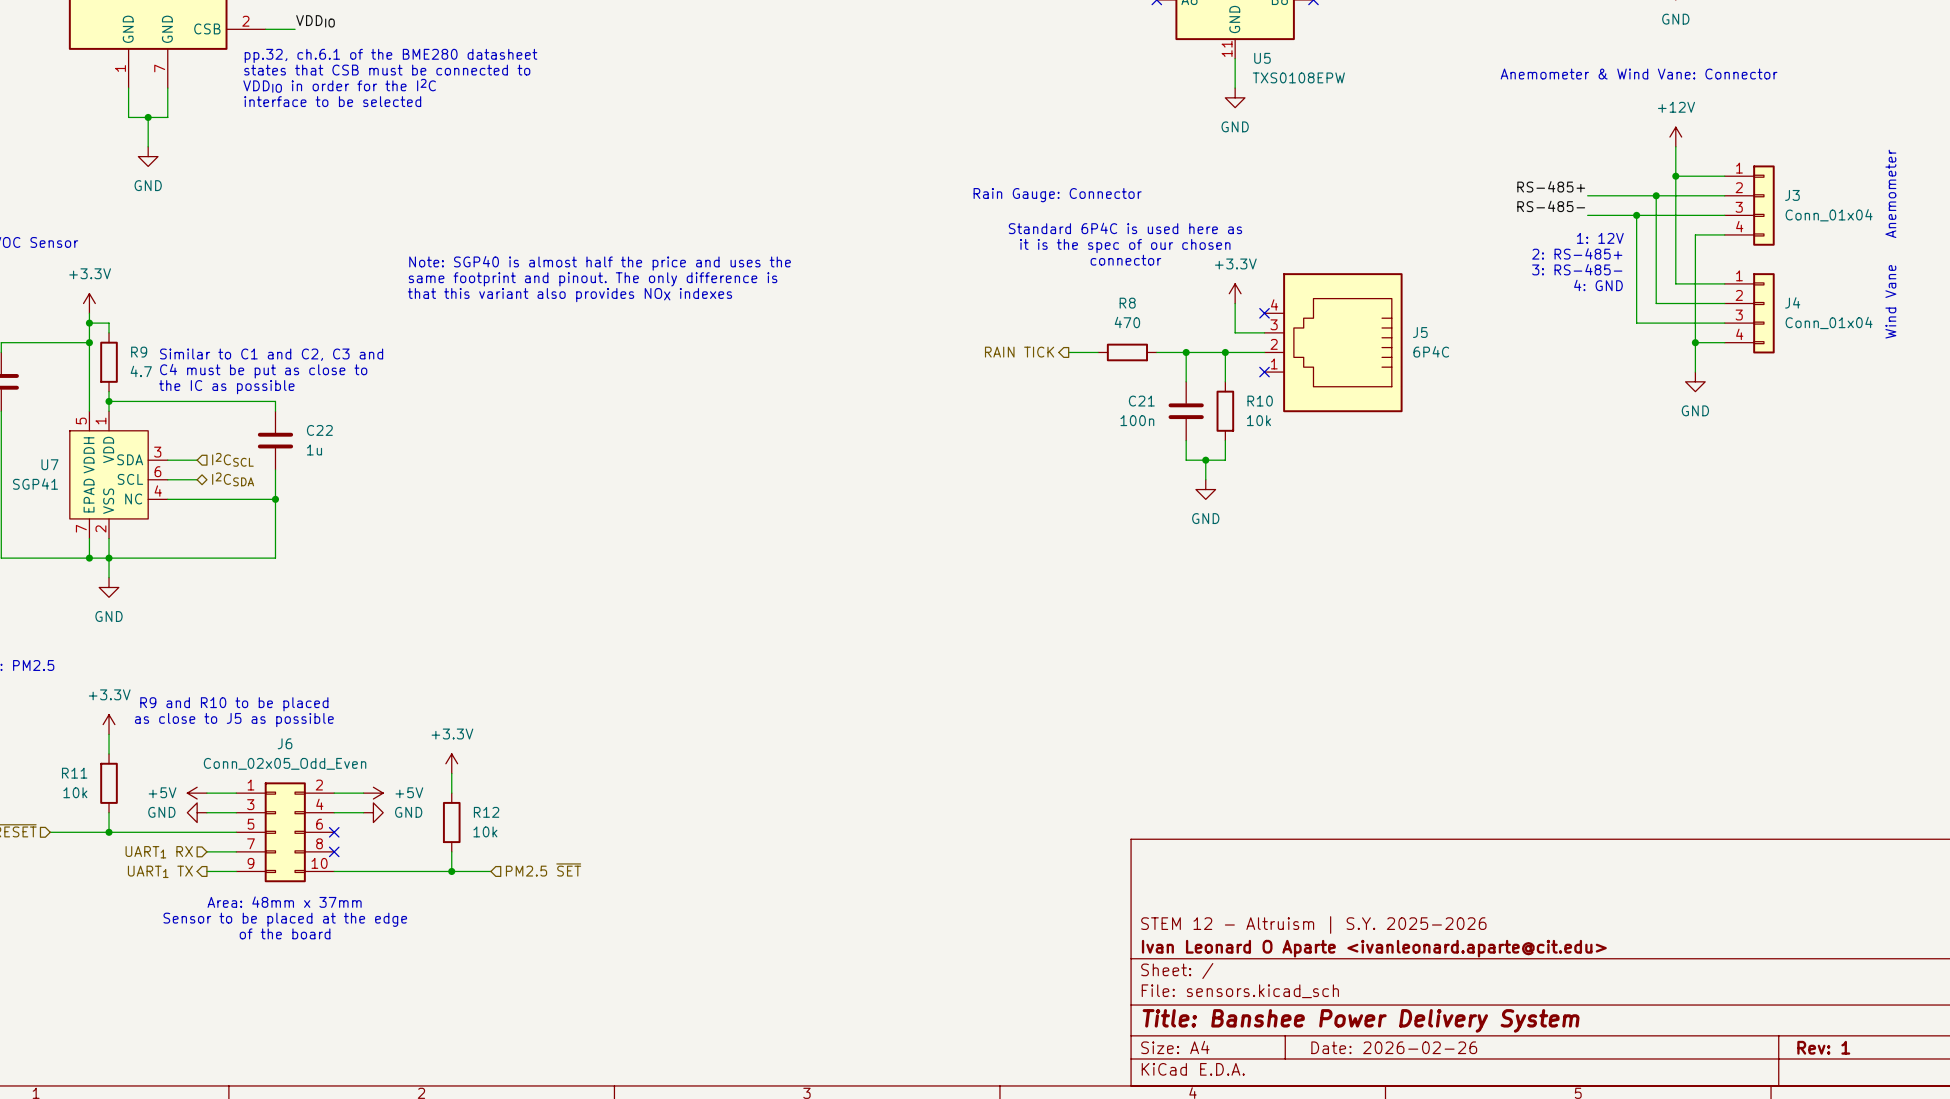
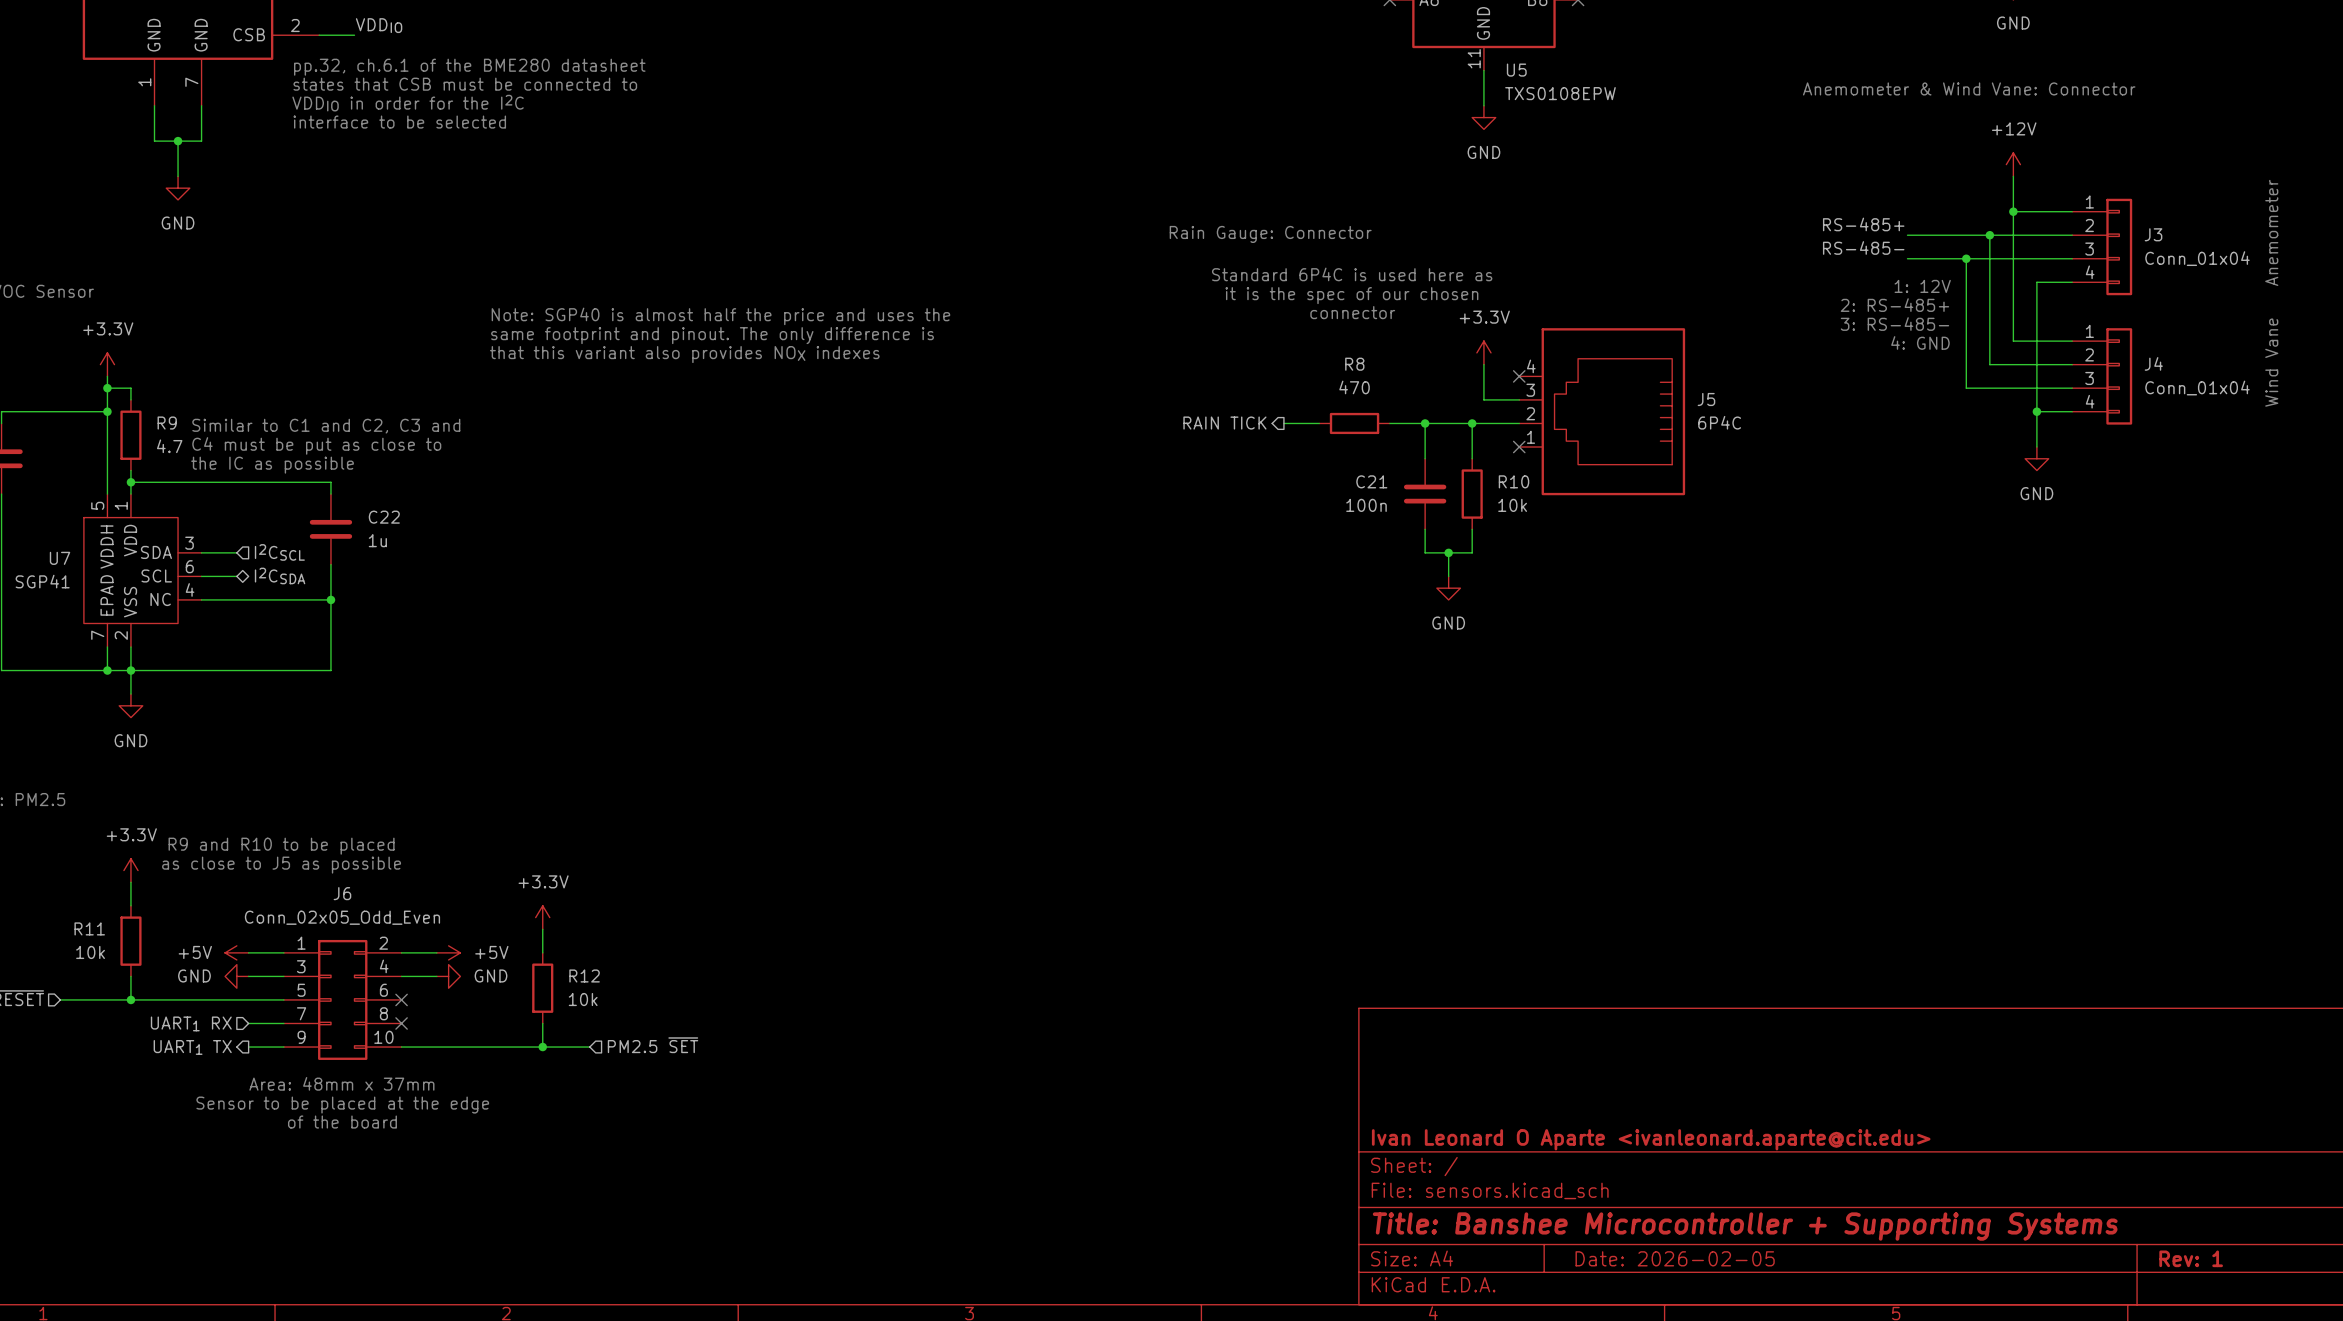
title block: STEM 12 - Altruism | S.Y. 2025-2026 (1313, 925) -> none
title block: Title: Banshee Power Delivery System (1361, 1020) -> Title: Banshee Microcontroller + Supporting Systems (1745, 1226)
title block: Date: 2026-02-26 (1394, 1047) -> Date: 2026-02-05 (1675, 1258)

